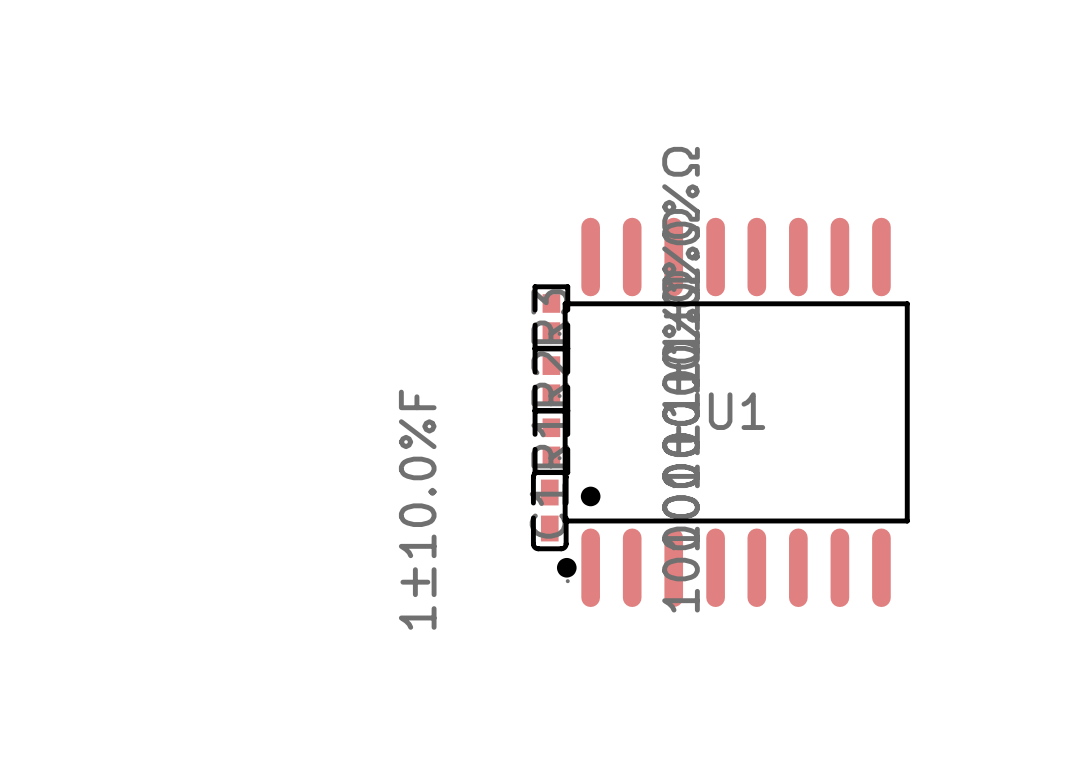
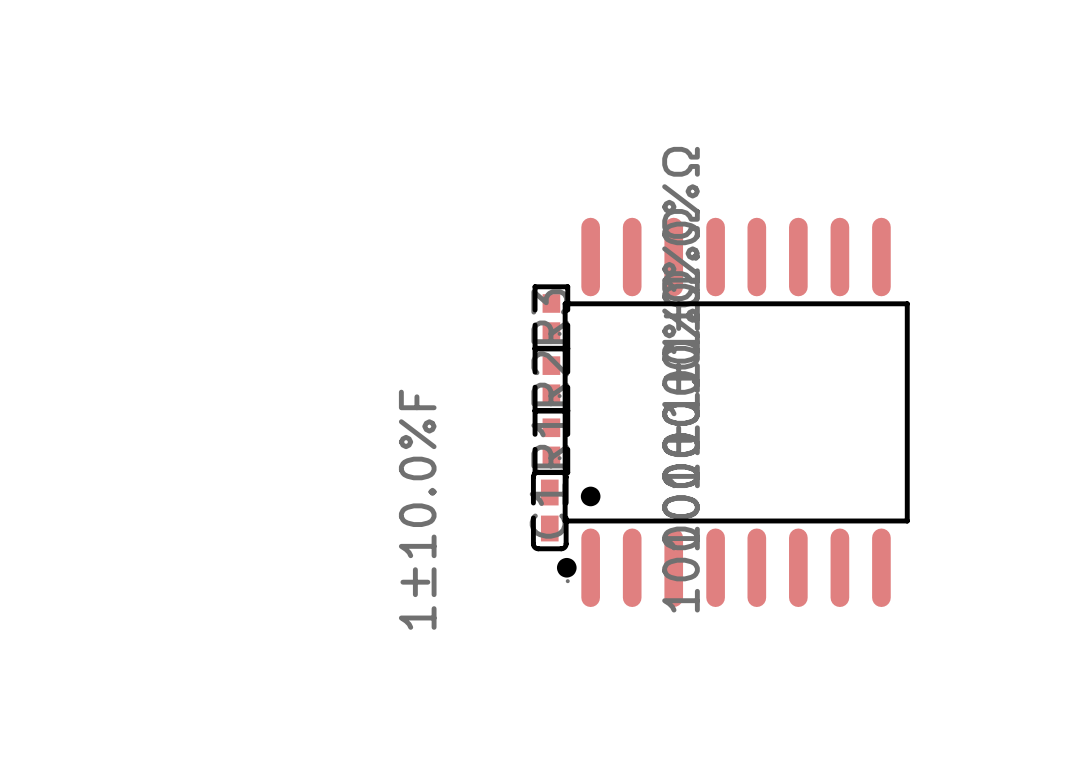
U1 name: U1 (736, 411) -> none

